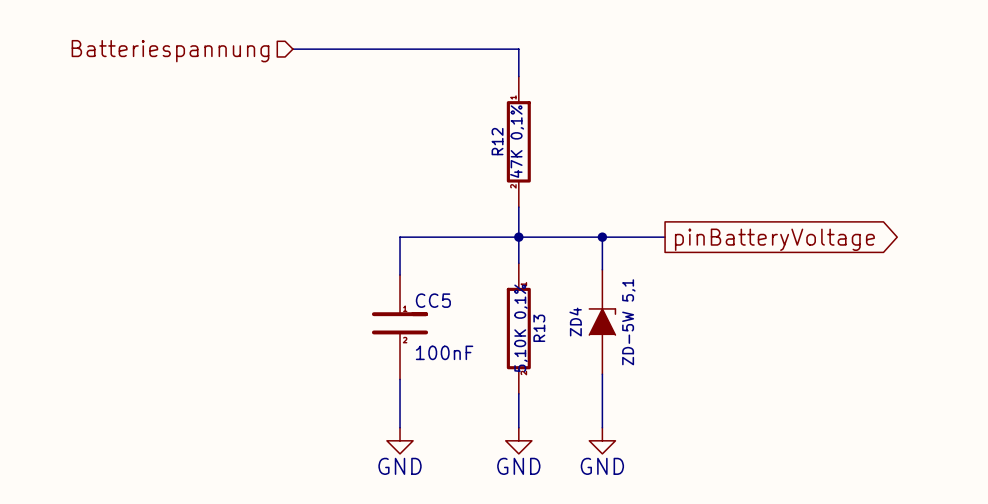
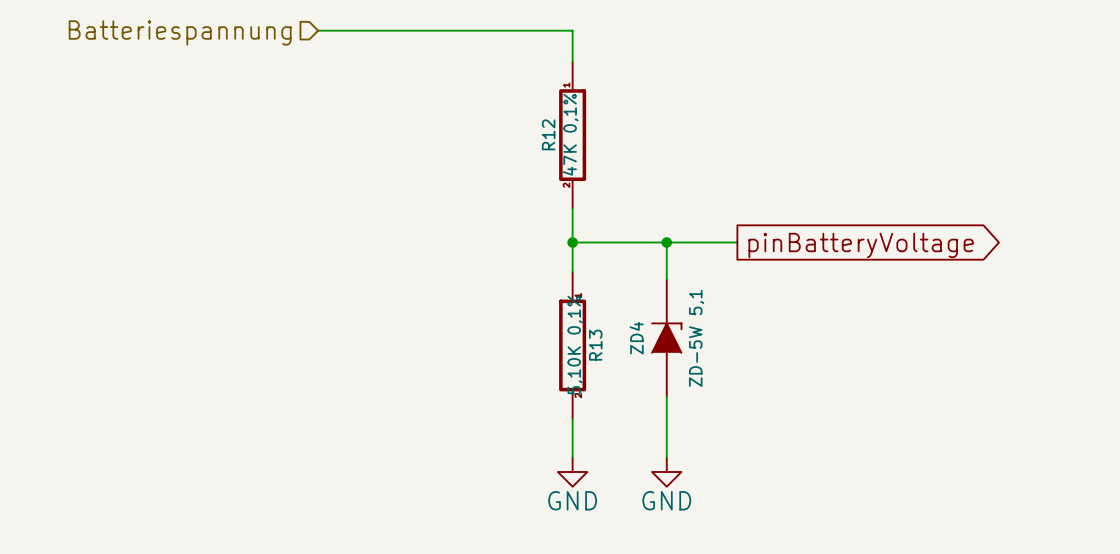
wire: (518, 237) (400, 237) (400, 275) -> none
CC5: 100nF (400, 327) -> none
wire: (400, 379) (400, 427) -> none
power symbol: GND (400, 440) -> none

